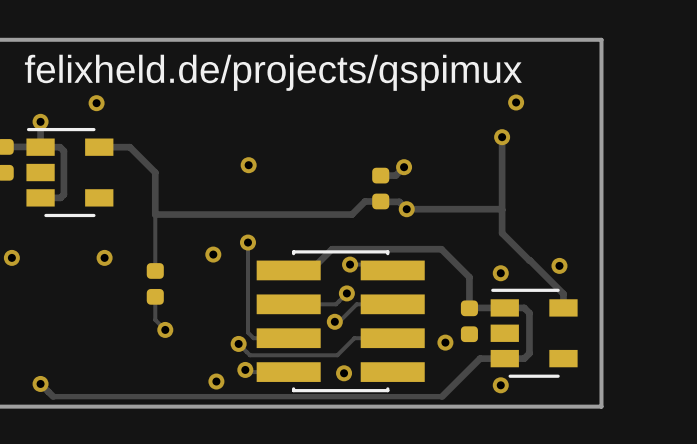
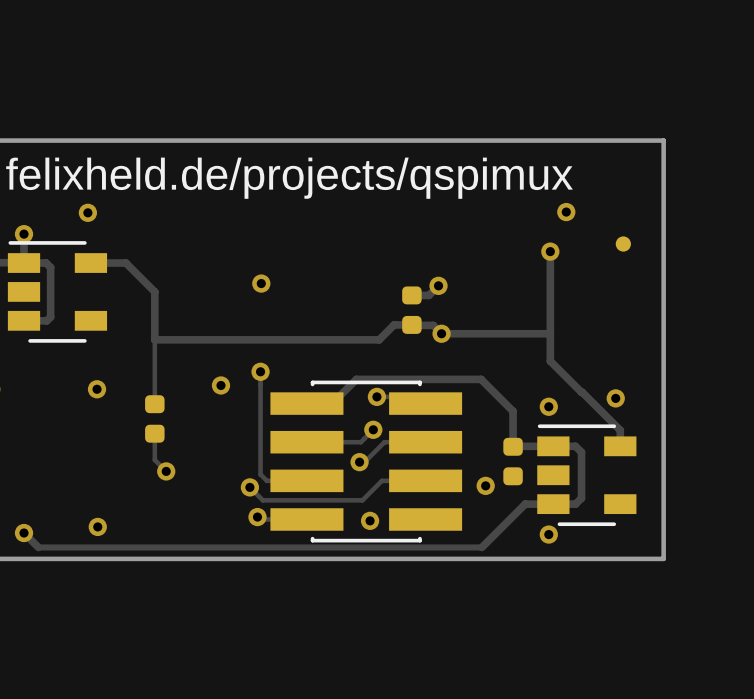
part: none -> (623, 244)
via: none -> (97, 526)
via: (216, 381) -> none

